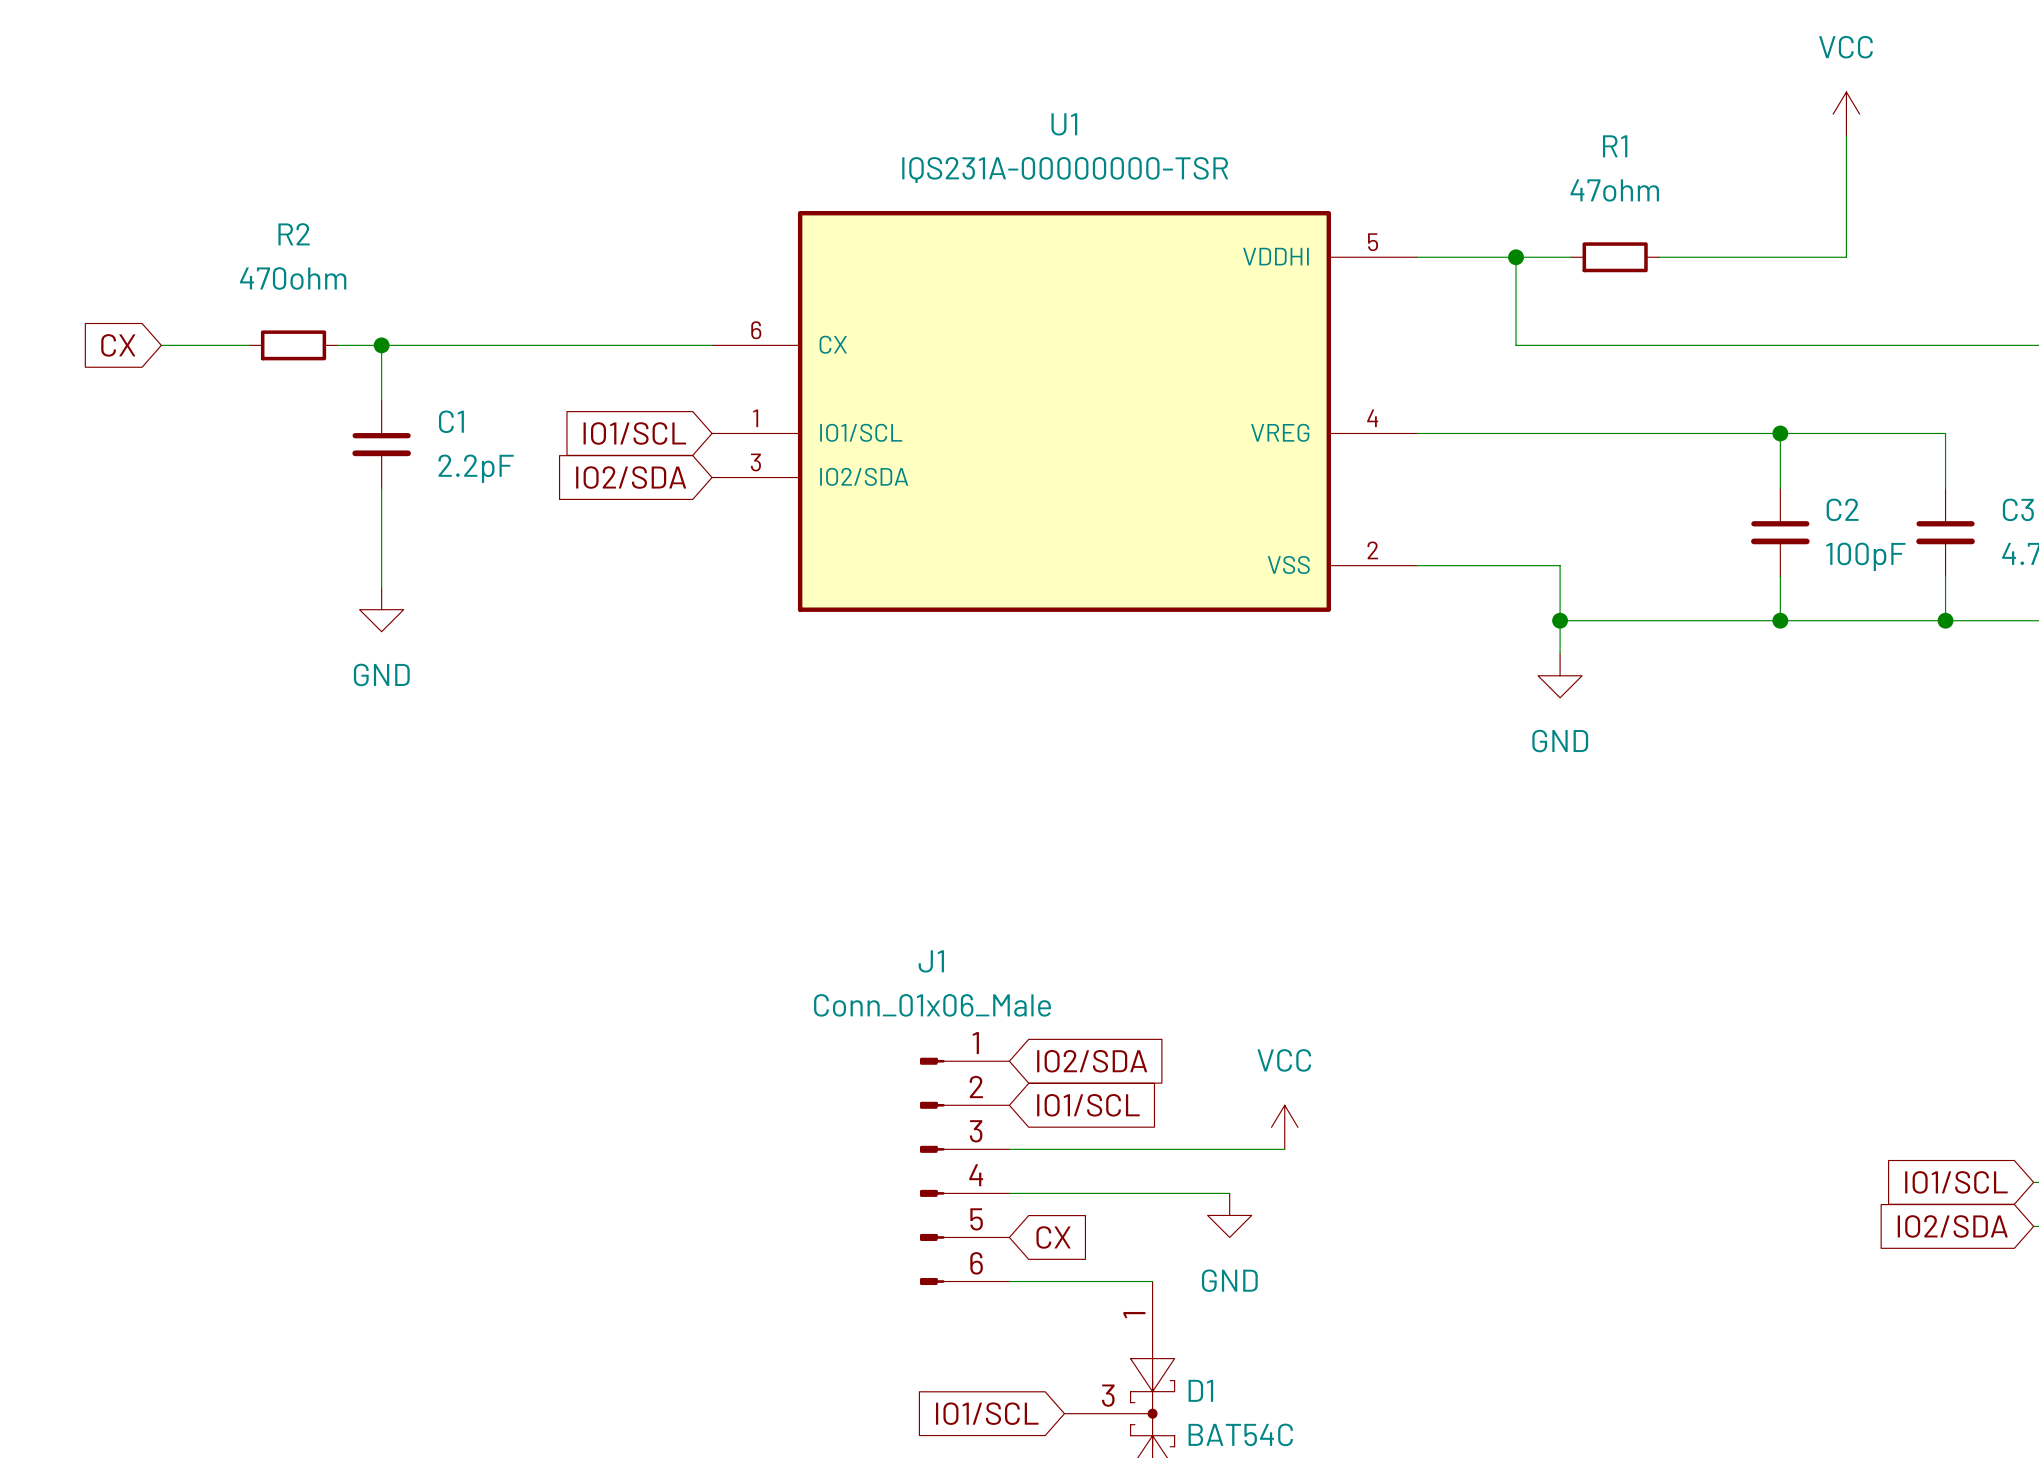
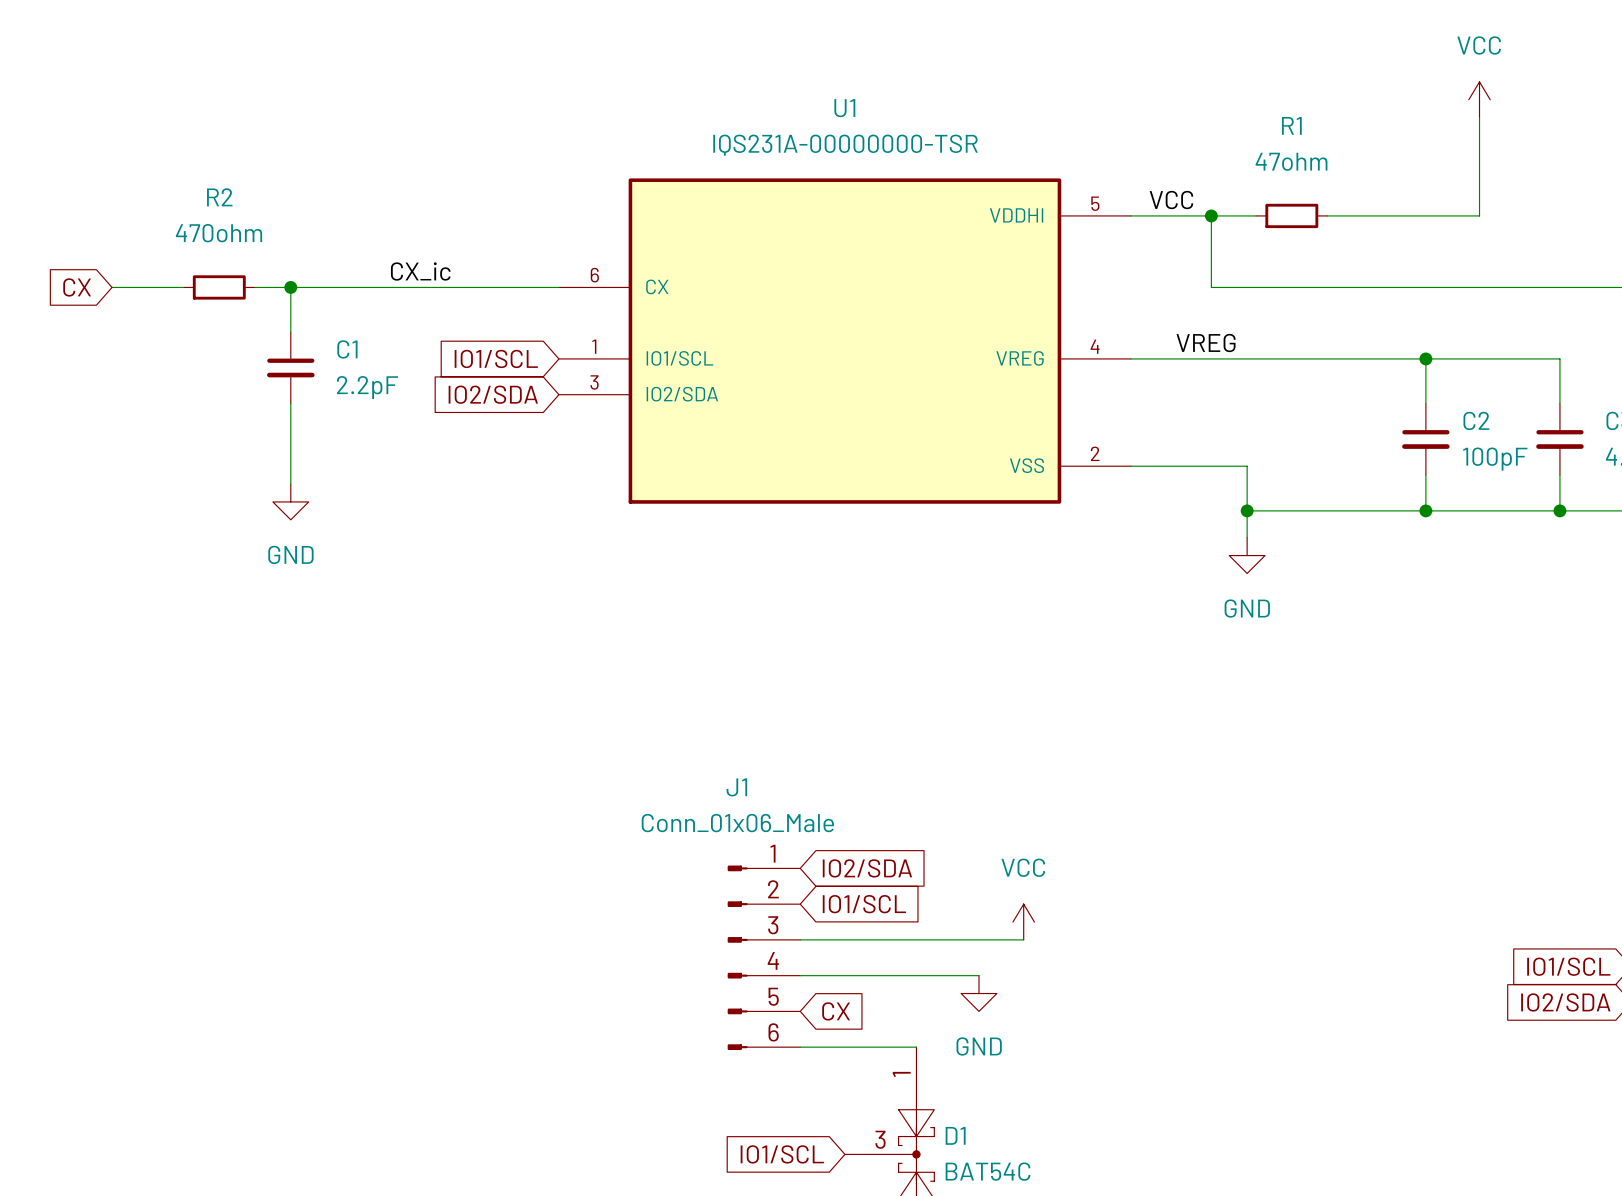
label: none -> VCC (1171, 200)
label: none -> CX_ic (420, 271)
label: none -> VREG (1206, 343)

